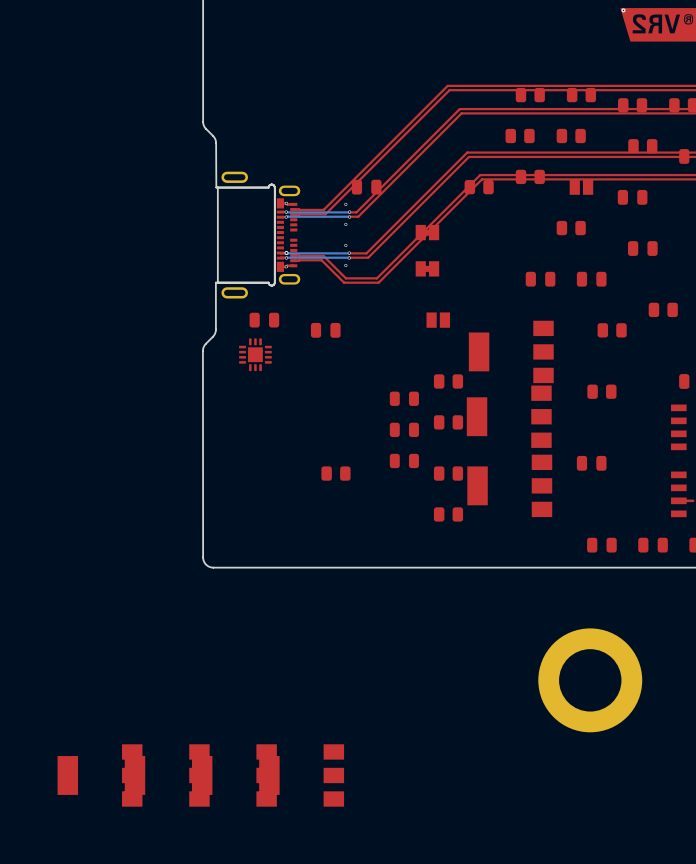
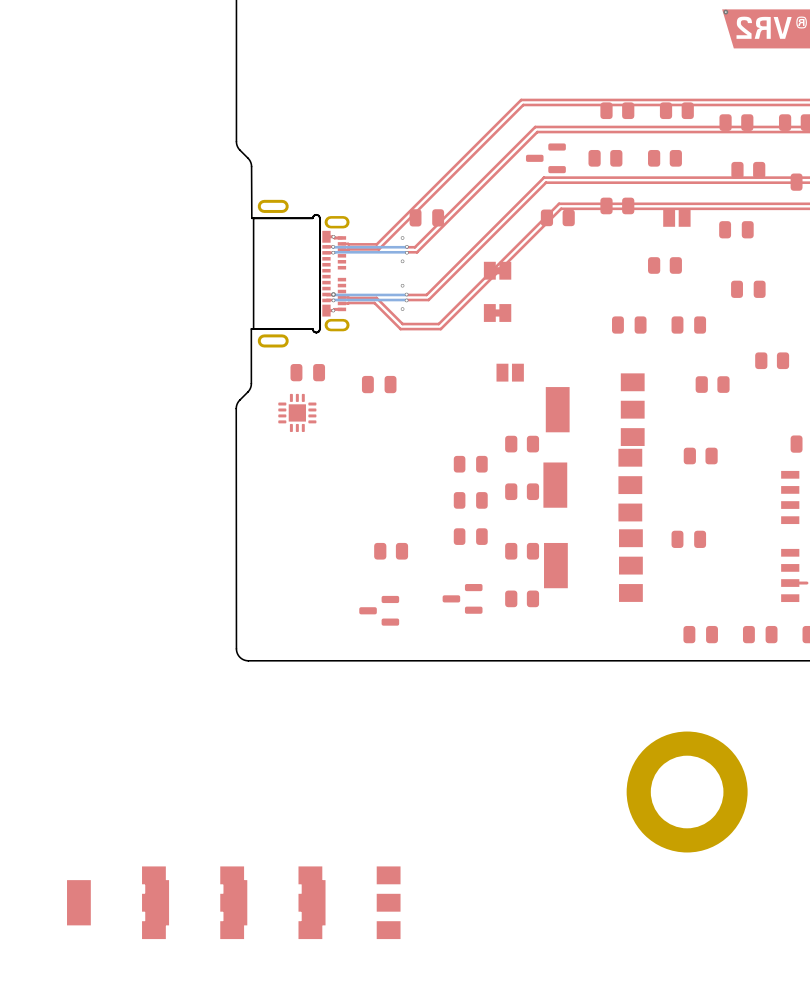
part: none -> (545, 158)
part: none -> (462, 598)
part: none -> (379, 610)

